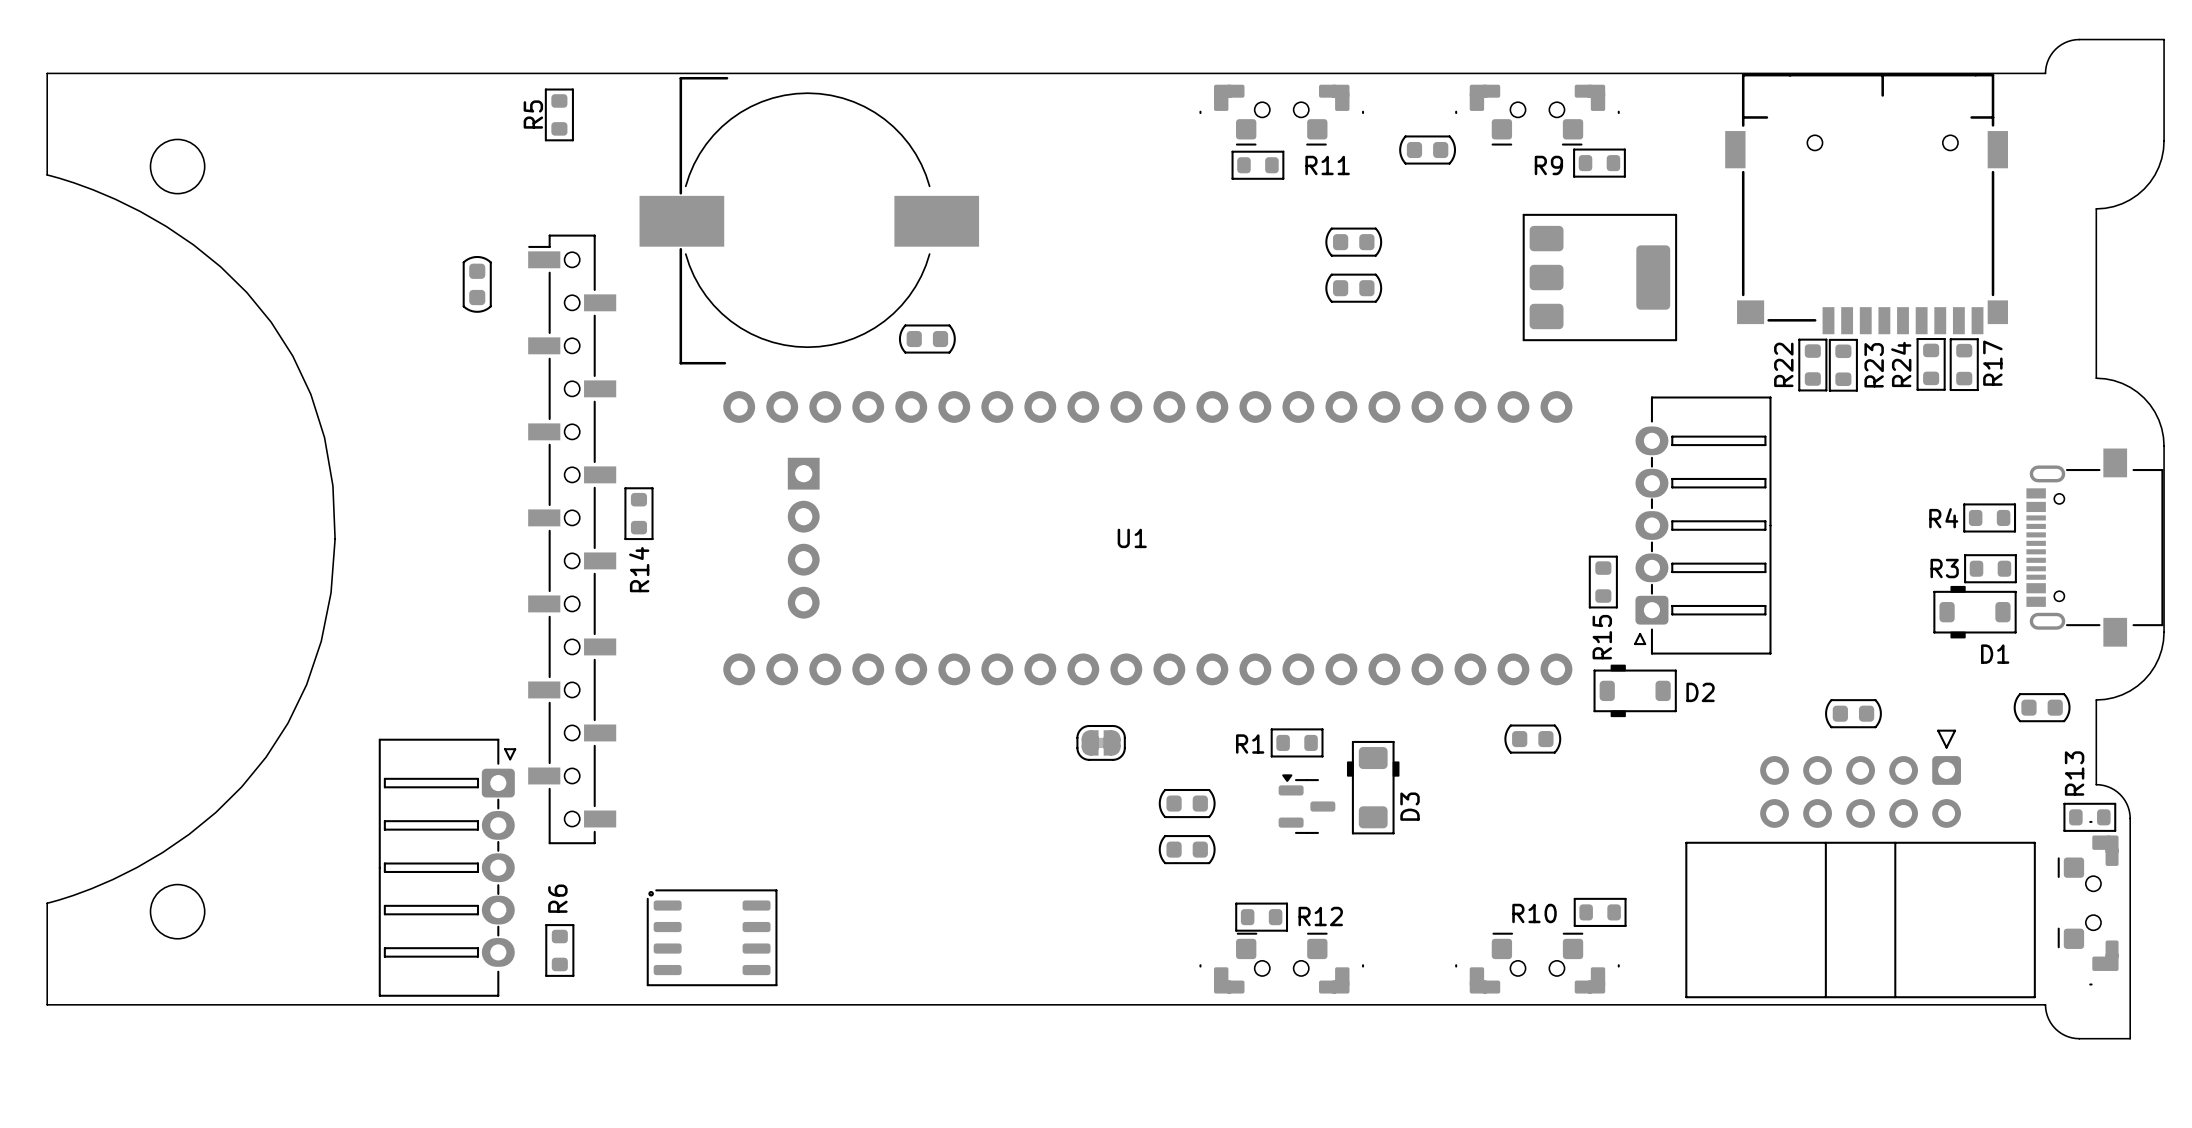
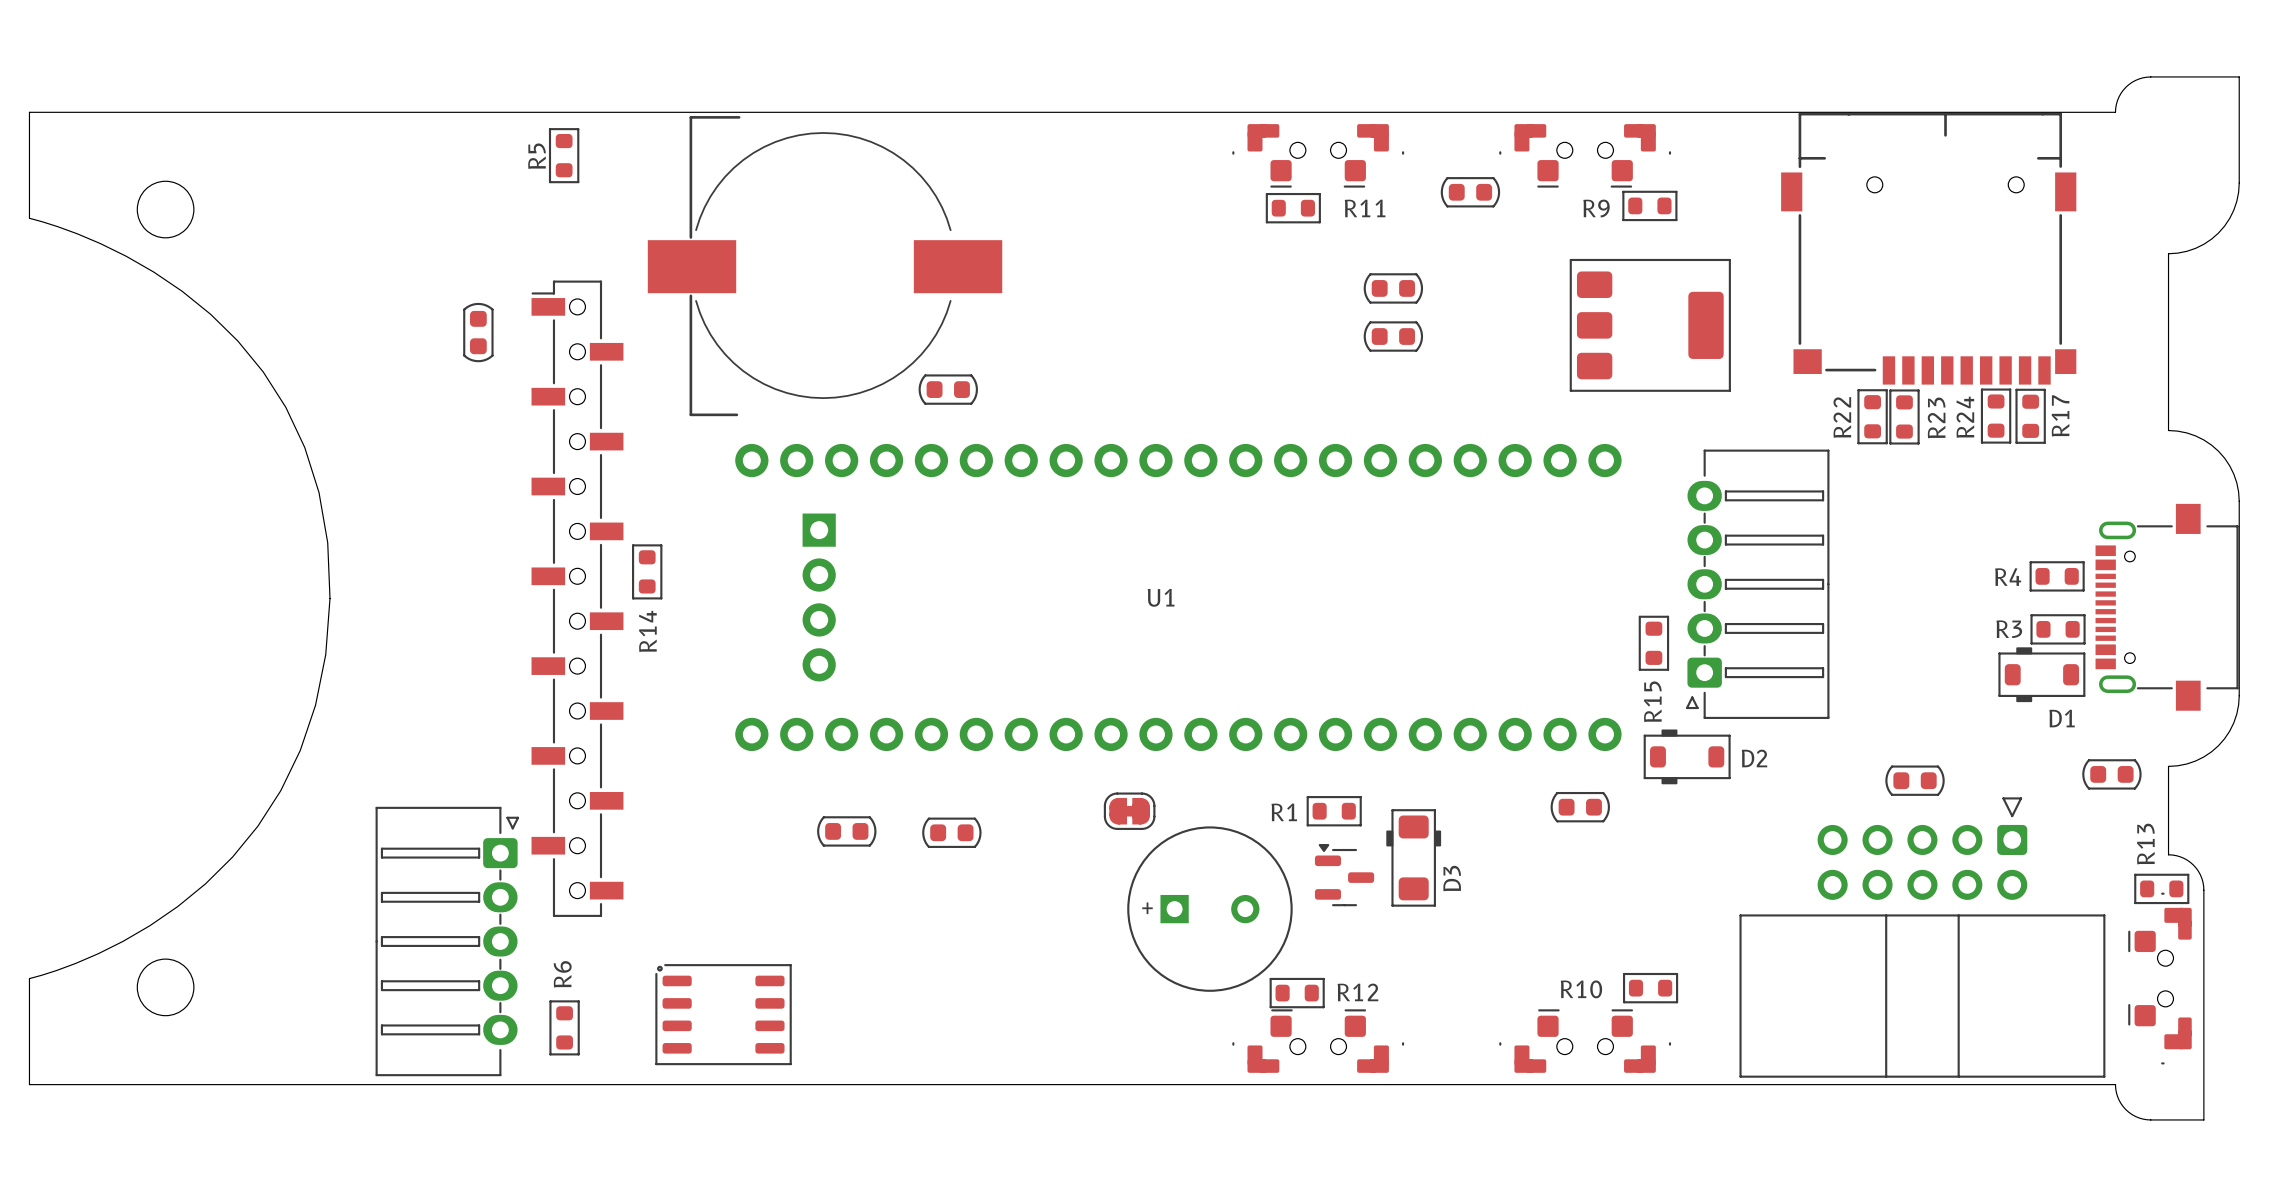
part: none -> (846, 831)
part: none -> (951, 832)
part: (1187, 803) -> none
part footprint: [1158, 835, 1216, 865] -> [1127, 826, 1293, 992]

